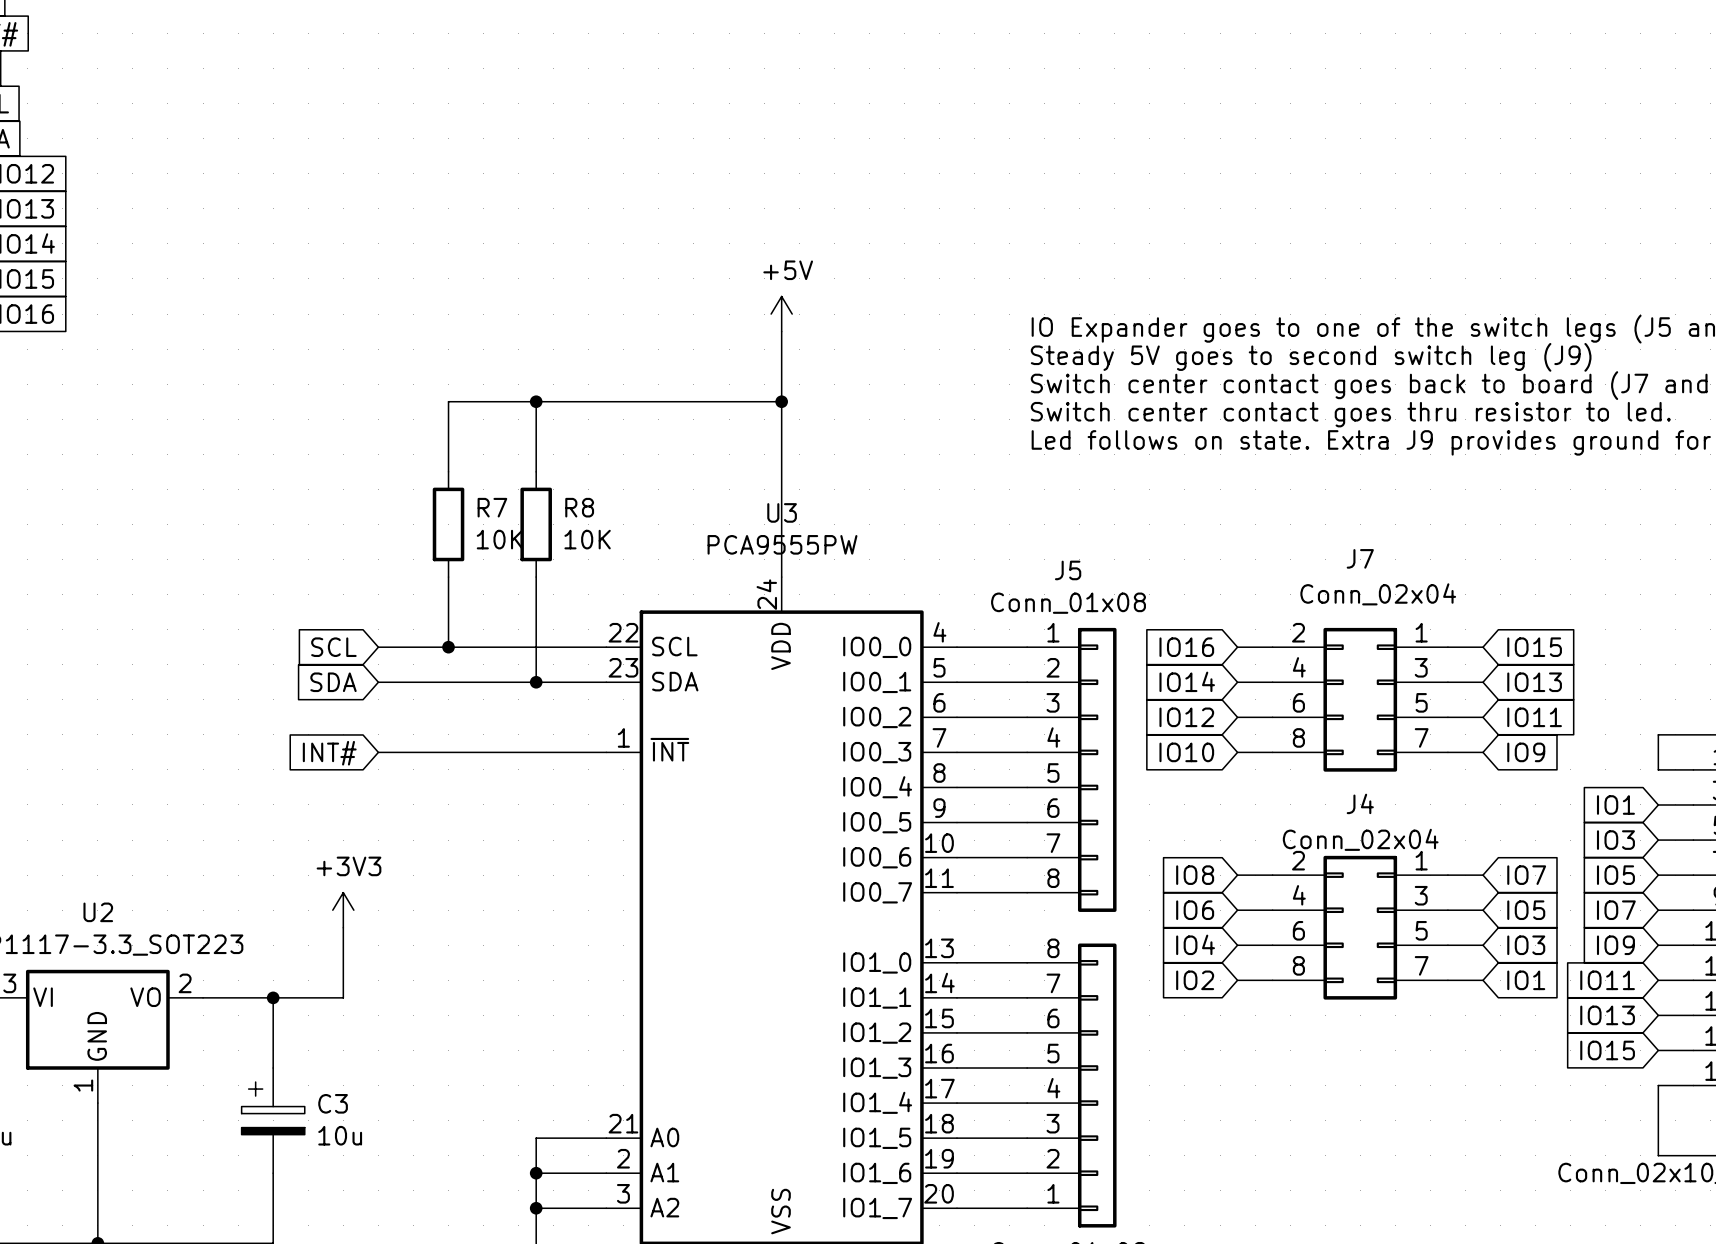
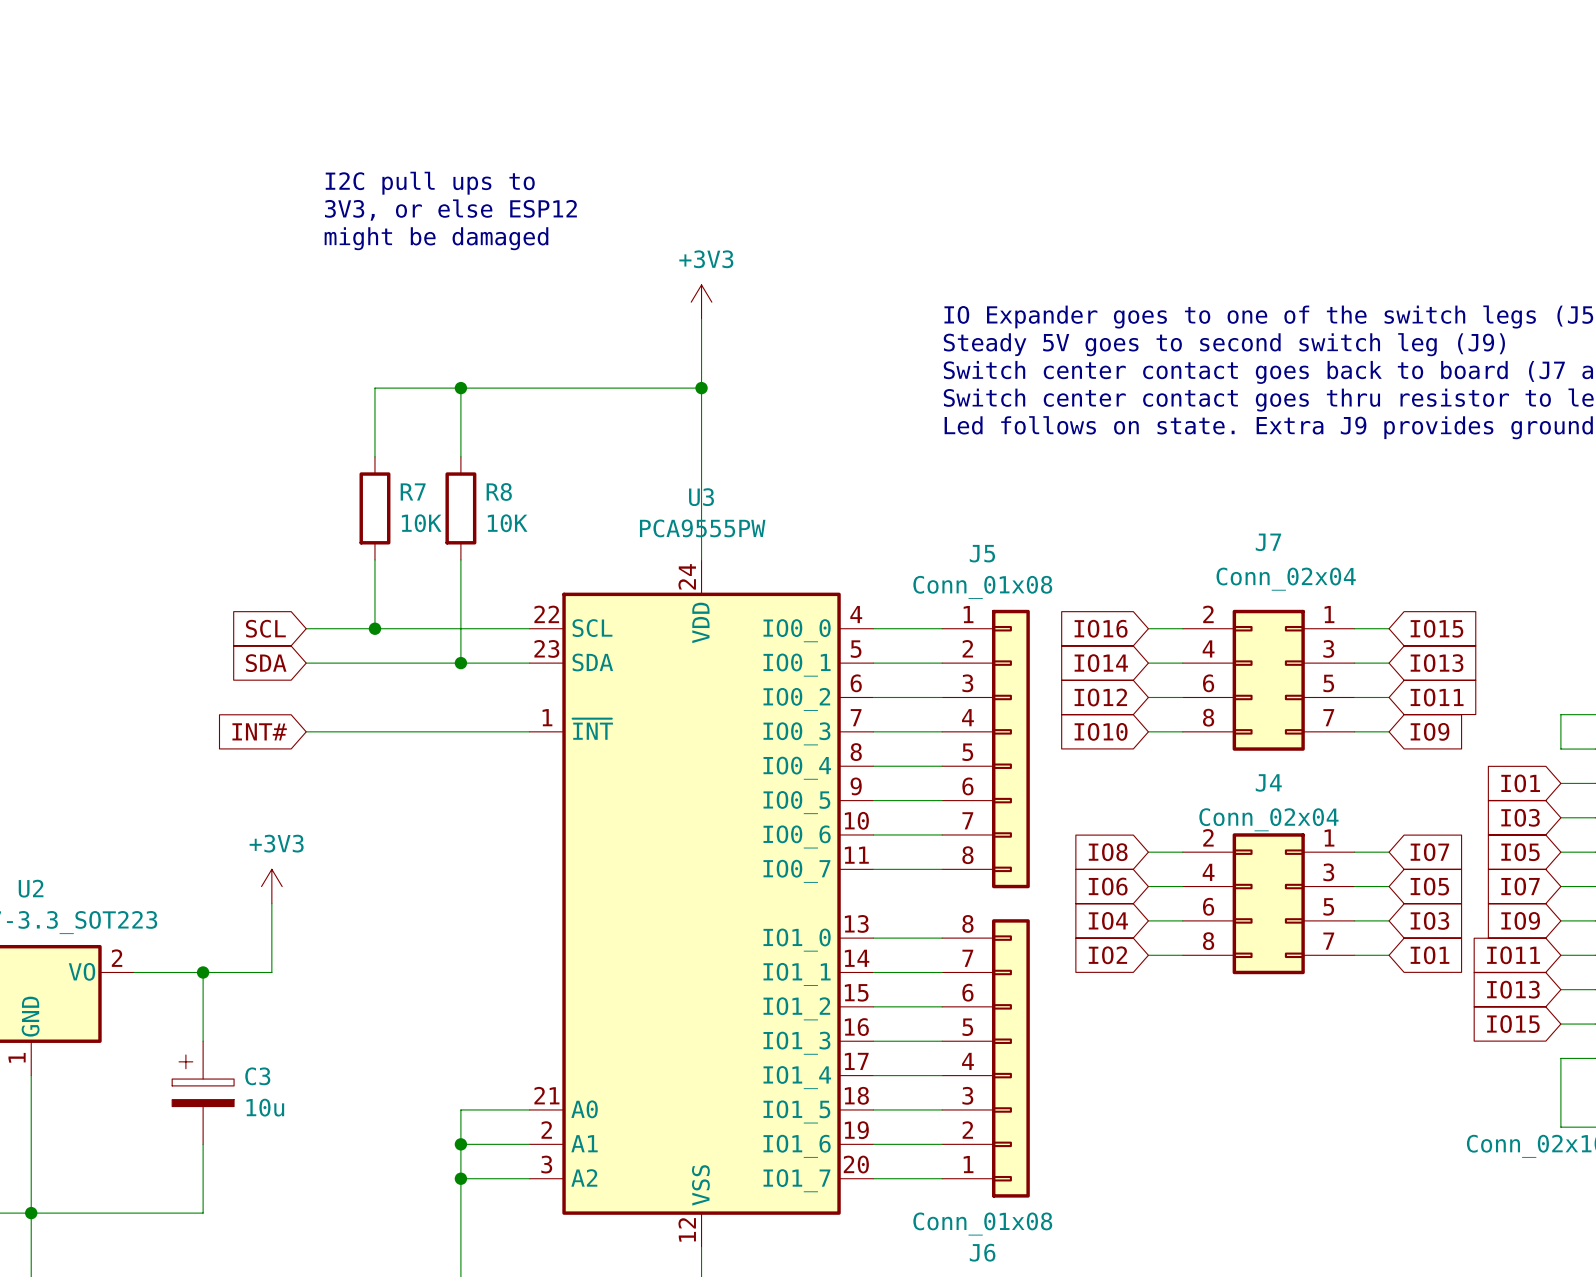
text: none -> I2C pull ups to (430, 183)
text: none -> 3V3, or else ESP12 (450, 210)
text: none -> might be damaged (436, 238)
power symbol: +5V (781, 314) -> +3V3 (701, 302)

